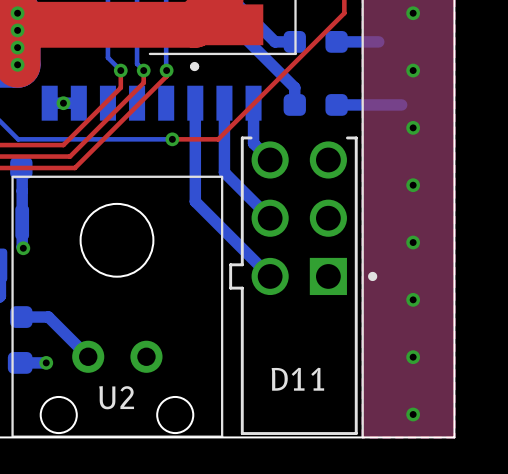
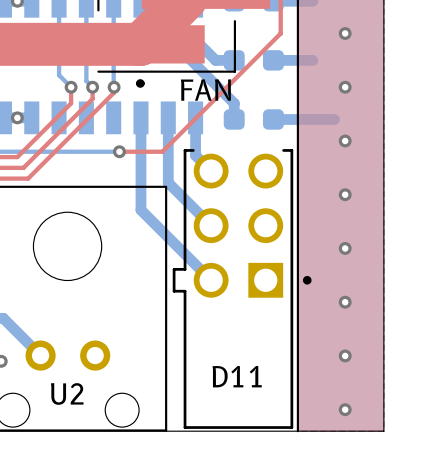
text: none -> FAN (205, 89)

